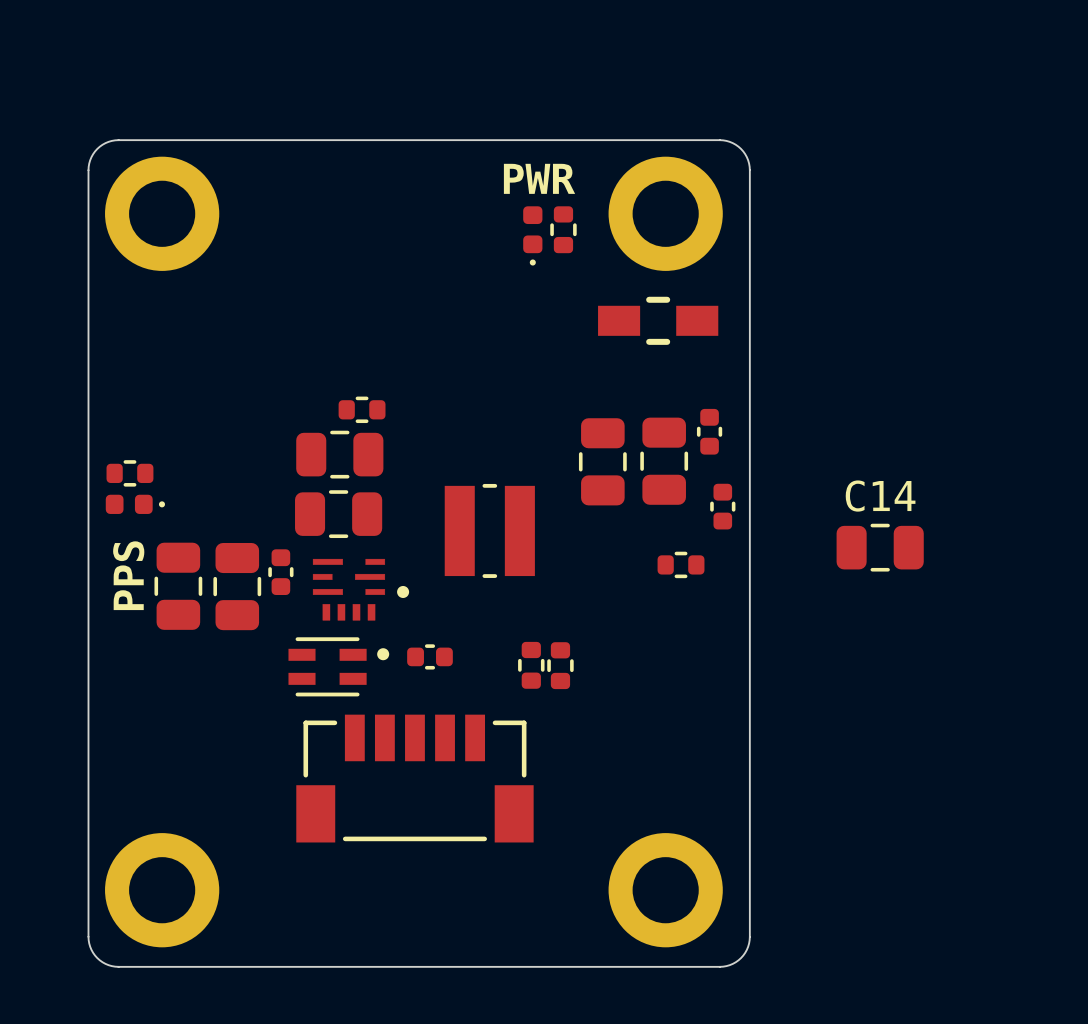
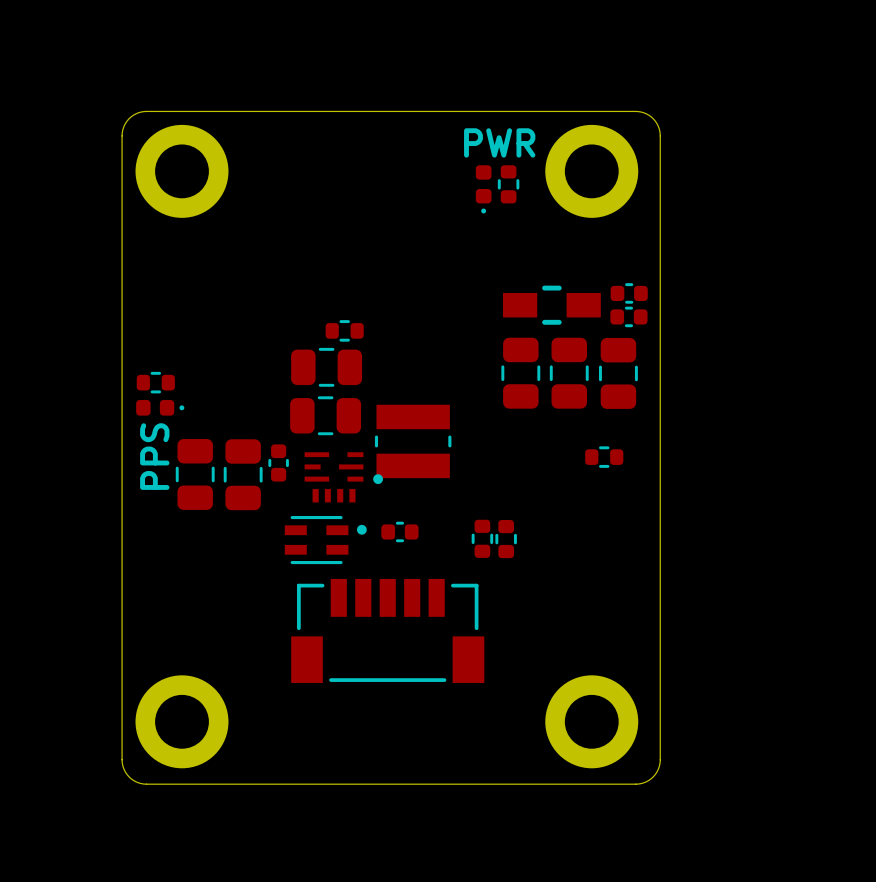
part position: (658, 320) -> (551, 305)
part: none -> (629, 293)
part: none -> (628, 316)
part: (709, 431) -> none
part: none -> (520, 373)
part: (602, 461) -> none
part: none -> (569, 373)
part: (664, 461) -> none
part: none -> (618, 373)
part: (722, 506) -> none
part rotation: 0° (489, 530) -> 90° clockwise (413, 441)
C14: (880, 547) -> none

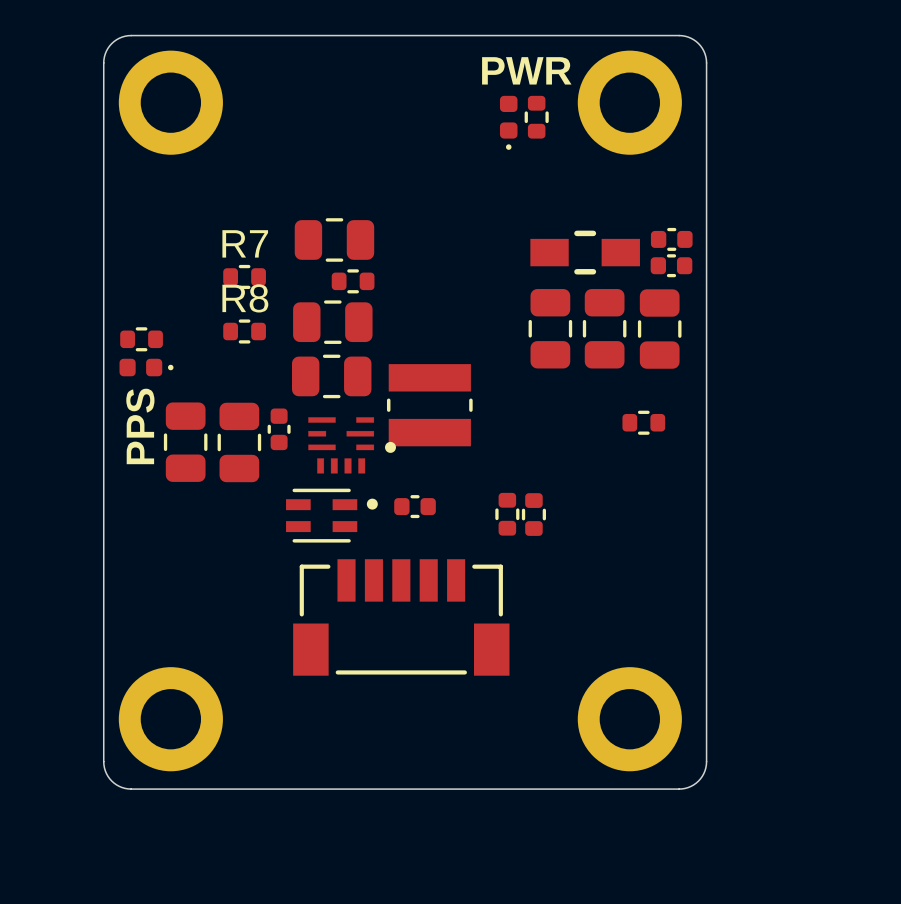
part: none -> (334, 239)
R7: none -> (244, 276)
R8: none -> (244, 331)

